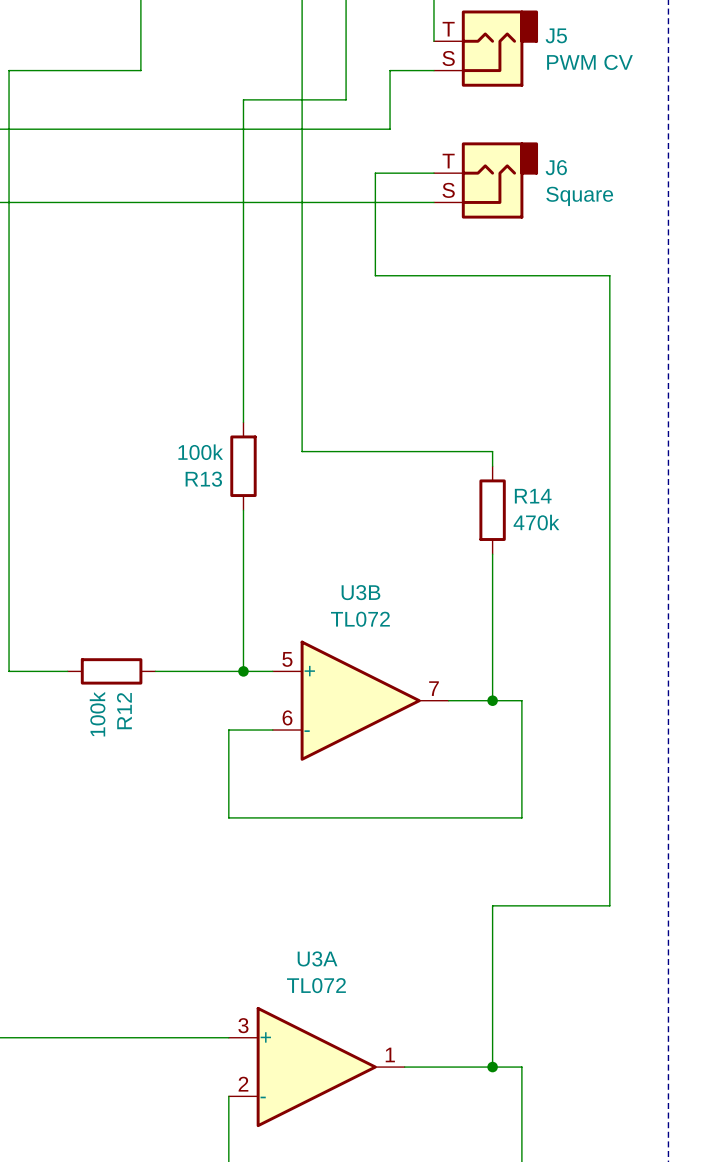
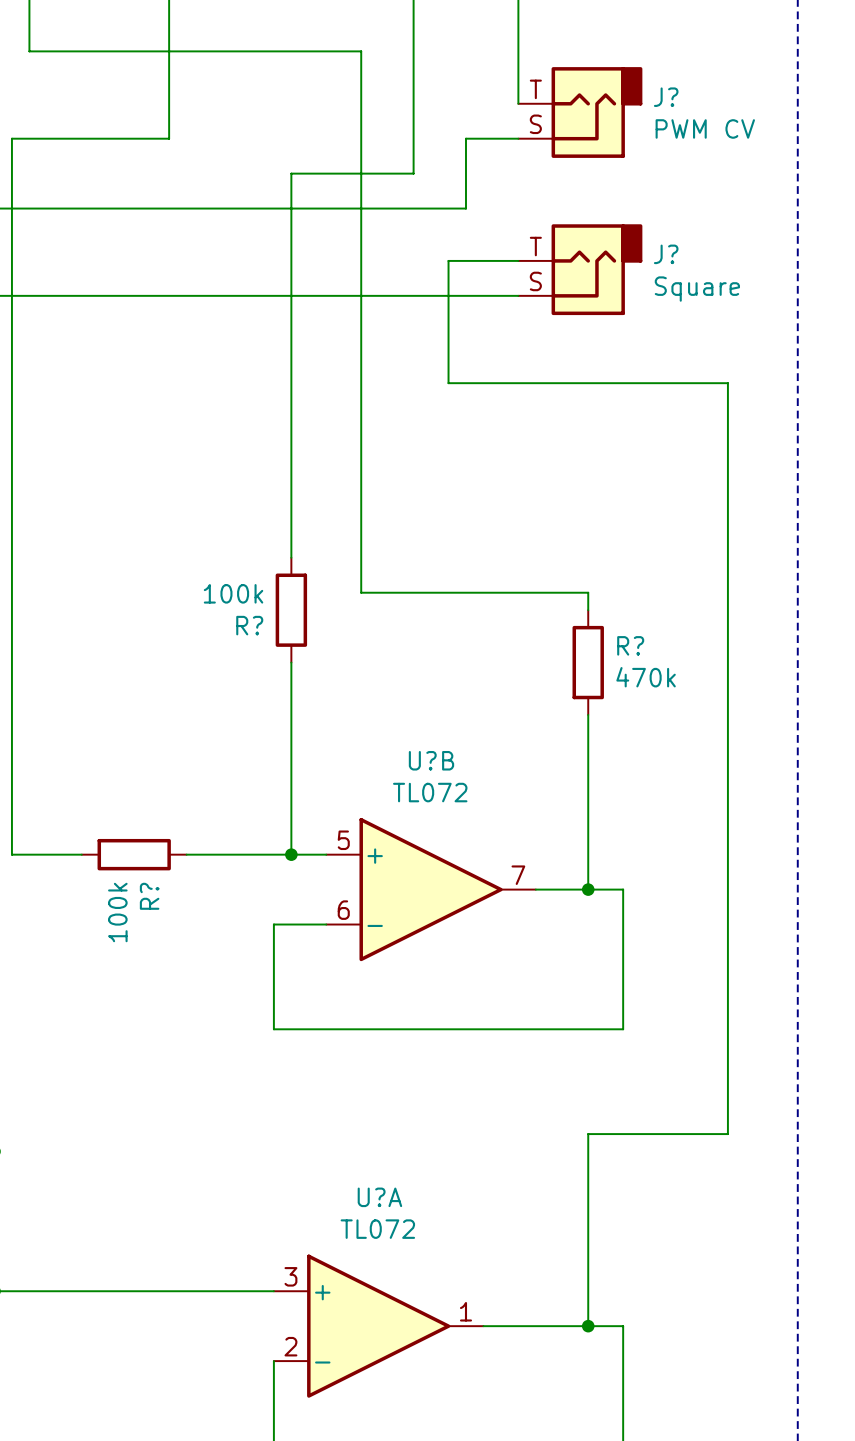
J5 name: J5 (556, 35) -> J? (666, 97)
J6 name: J6 (556, 167) -> J? (666, 254)
R13 name: R13 (203, 479) -> R? (249, 625)
R14 name: R14 (533, 496) -> R? (630, 645)
U3B name: U3B (360, 592) -> U?B (431, 760)
R12 name: R12 (124, 711) -> R? (149, 896)
U3A name: U3A (317, 958) -> U?A (379, 1197)

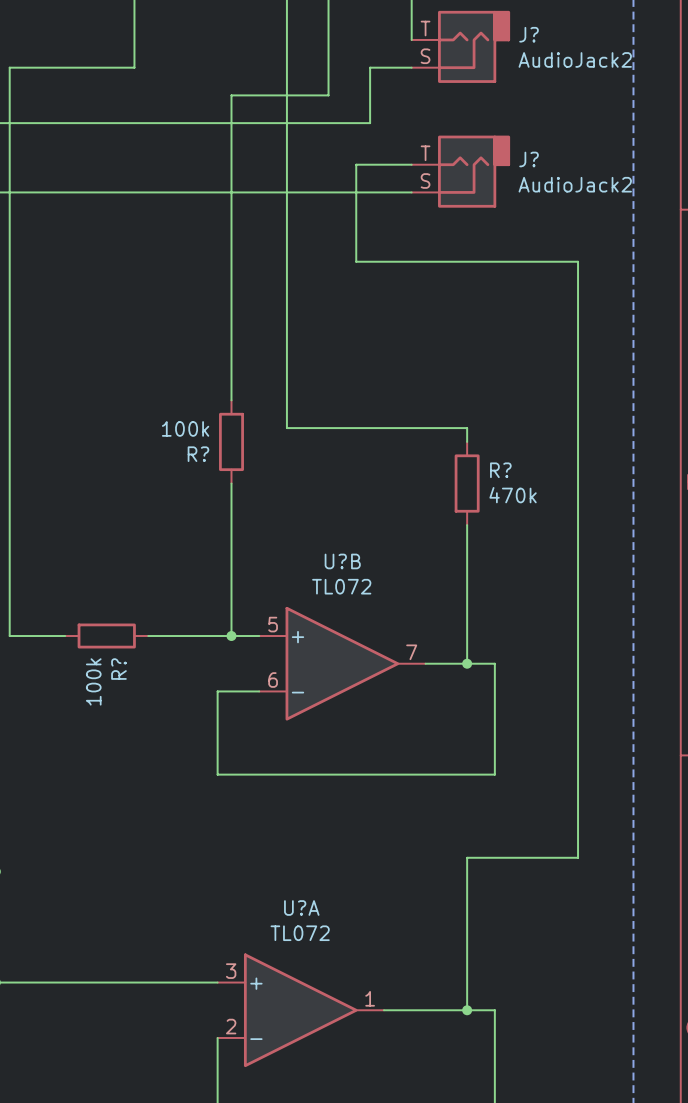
J? value: PWM CV (705, 128) -> AudioJack2 (575, 59)
J? value: Square (697, 289) -> AudioJack2 (575, 184)

